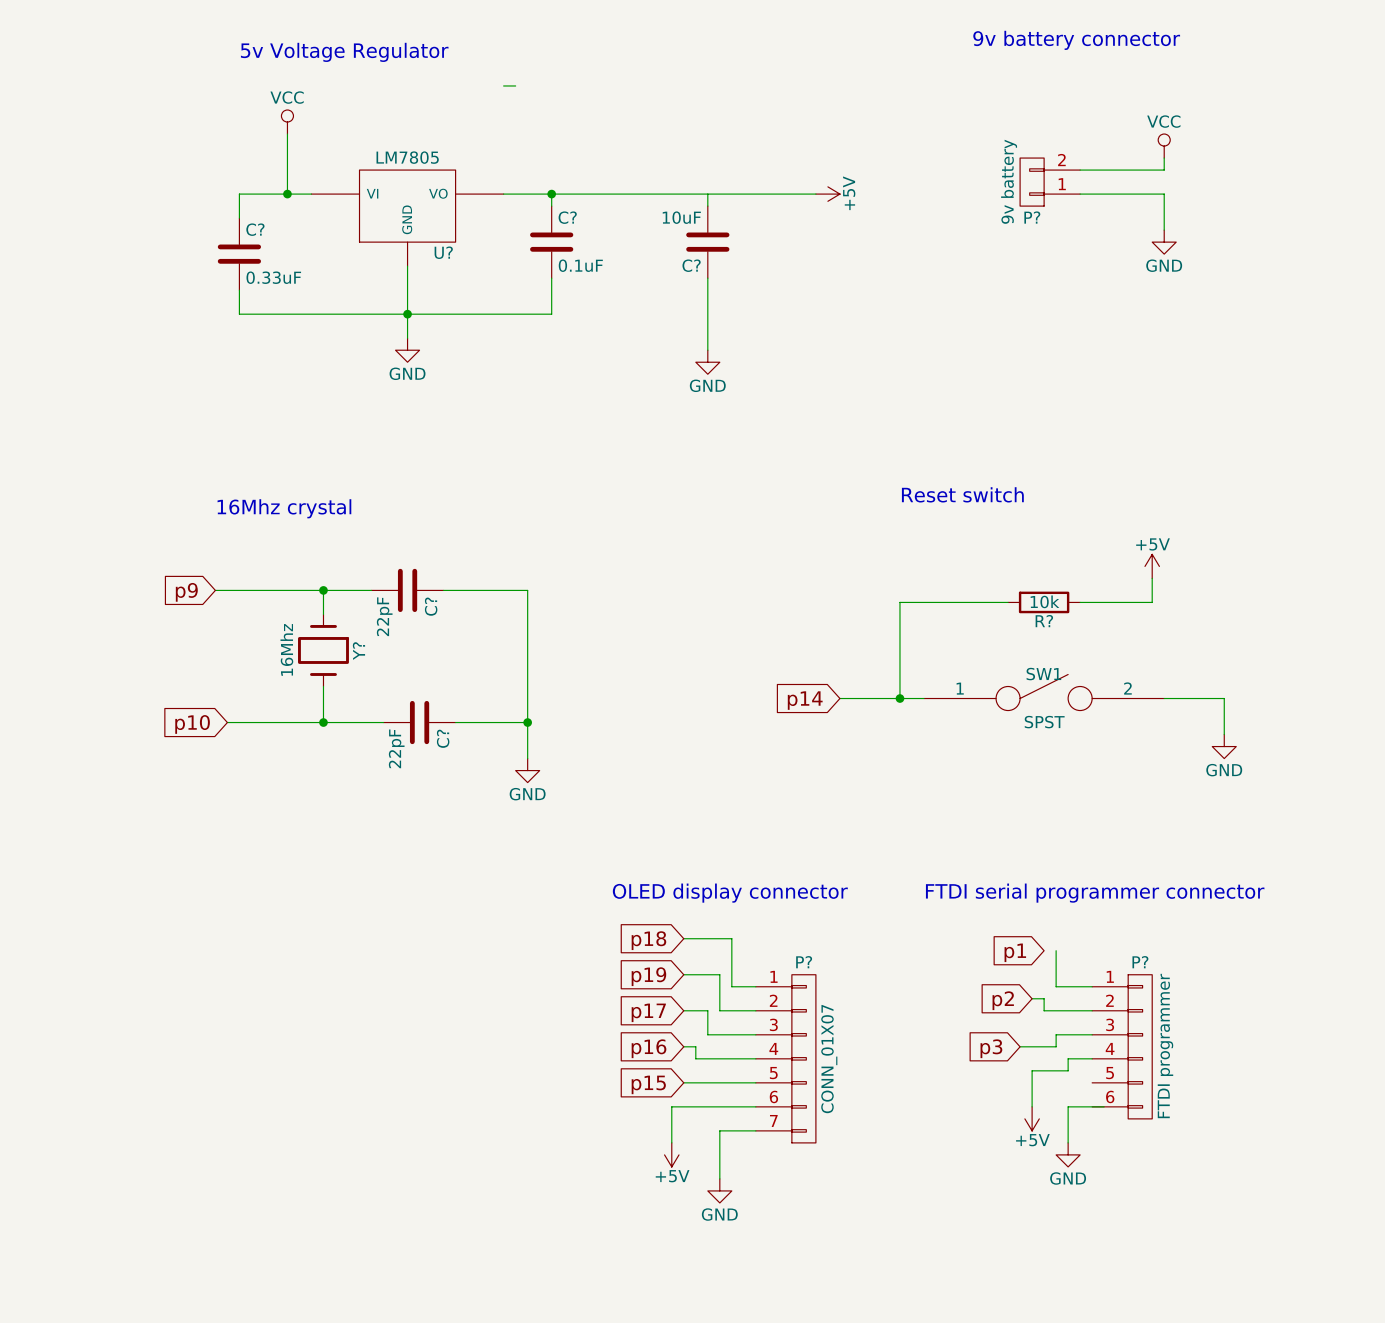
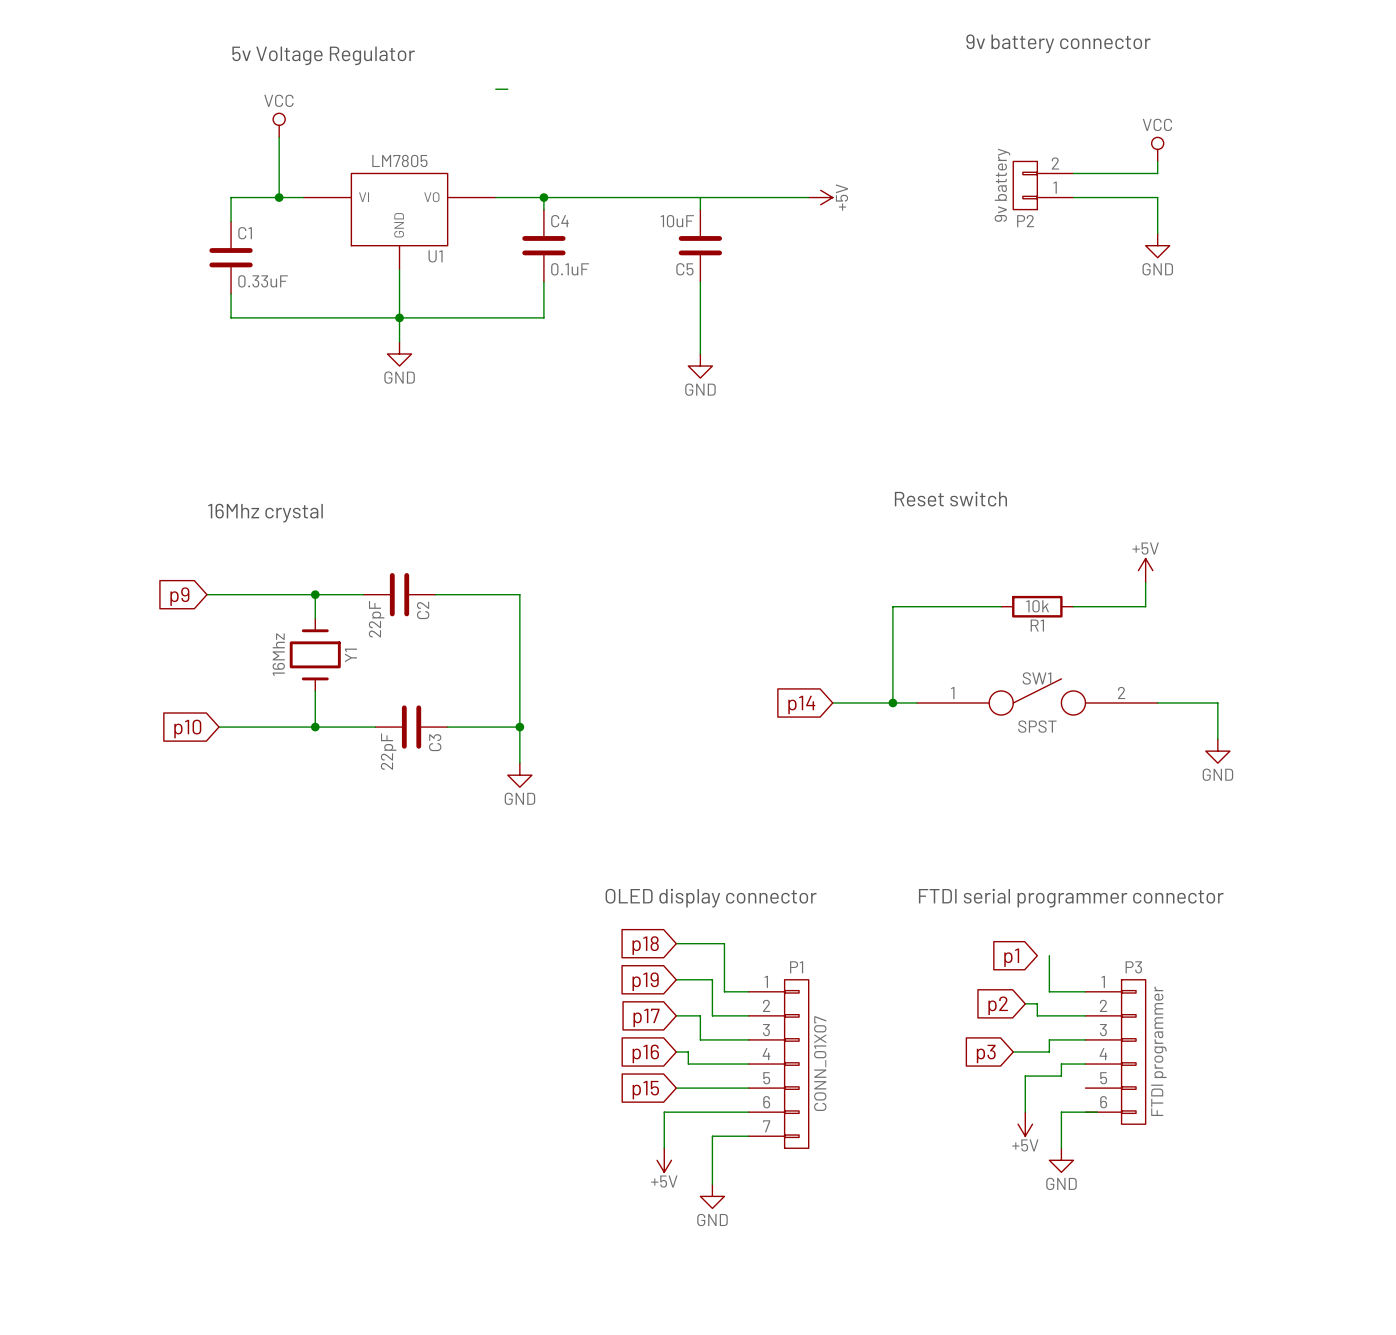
C? name: C? (567, 217) -> C4 (559, 221)
P? name: P? (1032, 217) -> P2 (1025, 221)
C? name: C? (255, 229) -> C1 (245, 233)
U? name: U? (443, 252) -> U1 (435, 256)
C? name: C? (691, 265) -> C5 (684, 269)
C? name: C? (431, 606) -> C2 (423, 610)
R? name: R? (1044, 621) -> R1 (1037, 625)
Y? name: Y? (358, 651) -> Y1 (350, 655)
C? name: C? (443, 738) -> C3 (435, 742)
P? name: P? (804, 962) -> P1 (796, 967)
P? name: P? (1140, 962) -> P3 (1133, 967)

